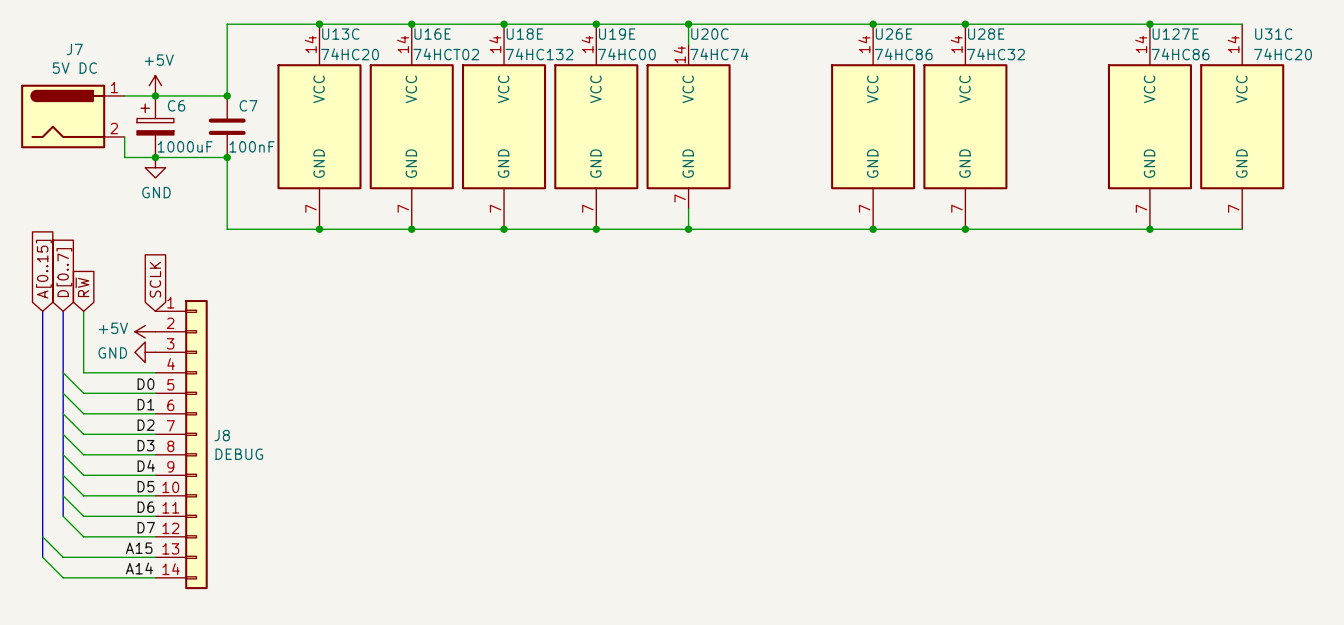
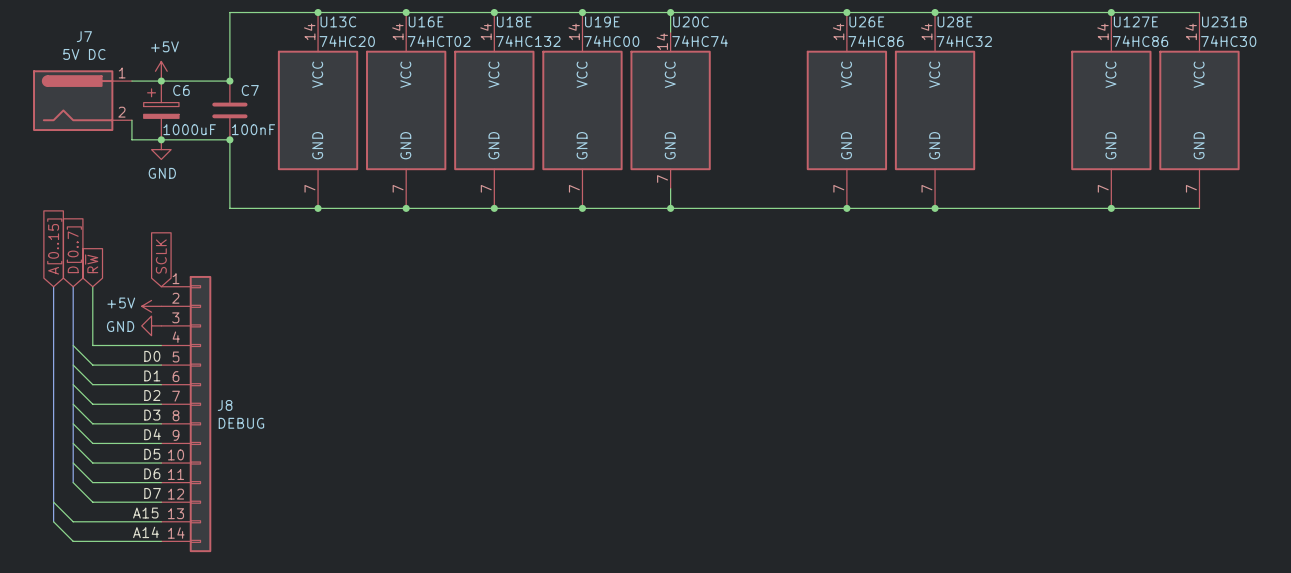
U31C name: U31C (1273, 34) -> U231B (1224, 21)
U31C value: 74HC20 (1283, 54) -> 74HC30 (1228, 41)

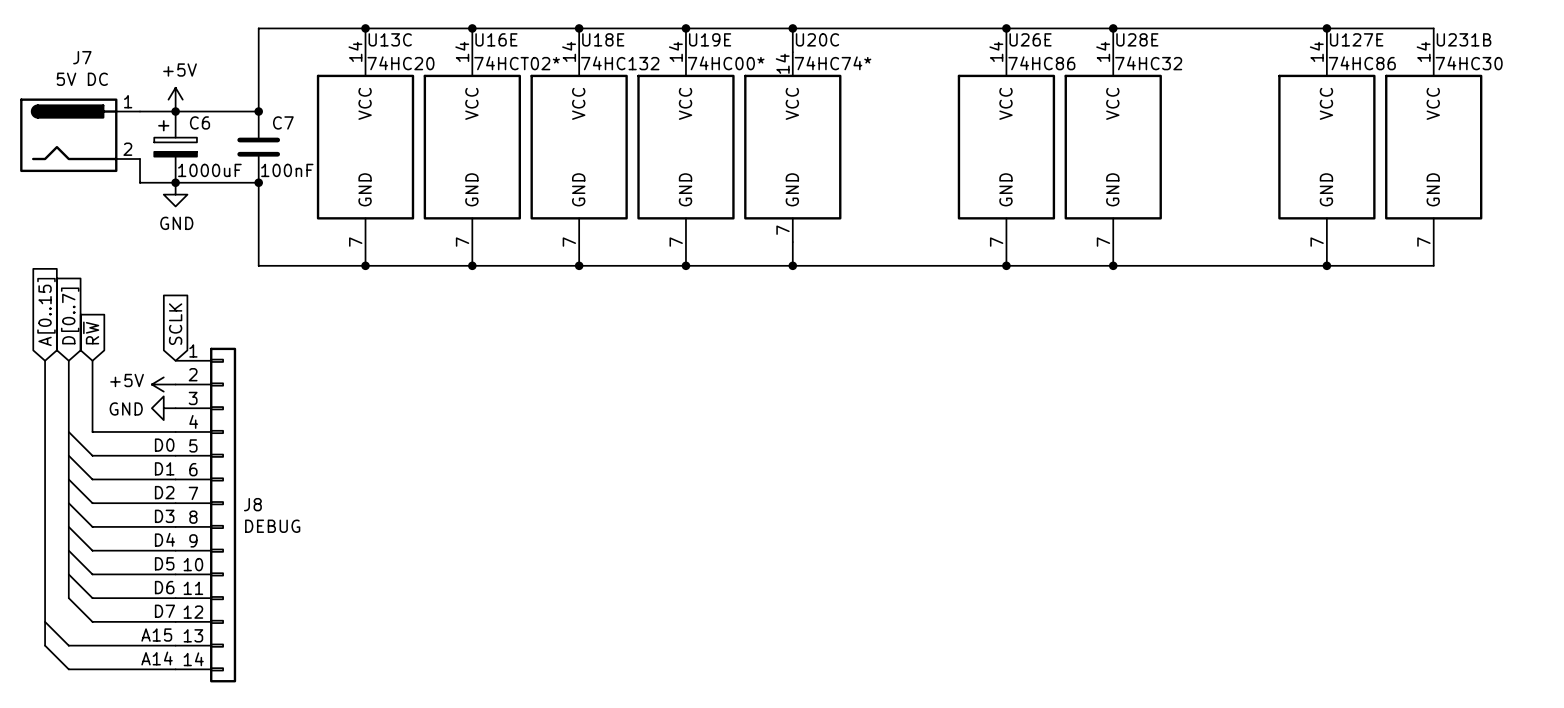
U16E value: 74HCT02 (439, 41) -> 74HCT02* (517, 63)
U19E value: 74HC00 (611, 41) -> 74HC00* (726, 63)
U20C value: 74HC74 (700, 41) -> 74HC74* (833, 63)

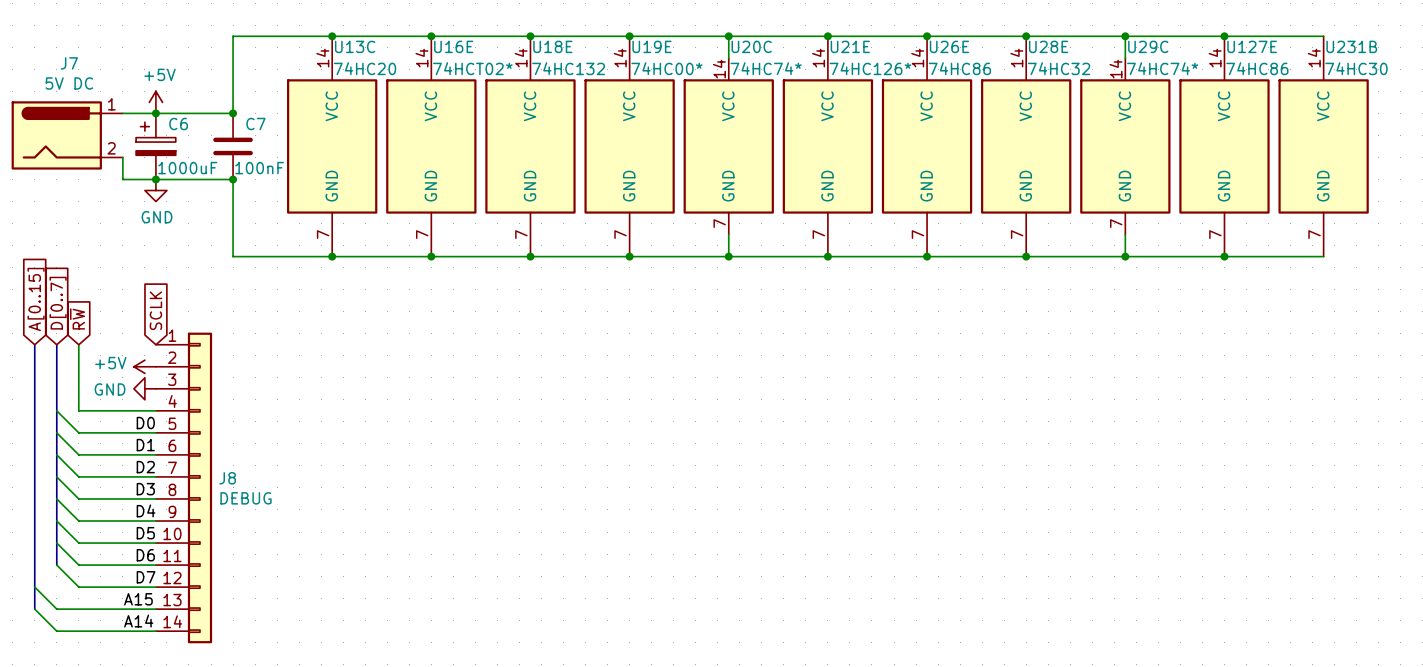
junction: none -> (827, 36)
wire: none -> (1125, 36) (1125, 58)
junction: none -> (1125, 36)
U21E: none -> 74HC126* (827, 146)
U29C: none -> 74HC74* (1125, 146)
wire: none -> (1125, 234) (1125, 256)
junction: none -> (827, 256)
junction: none -> (1125, 256)

